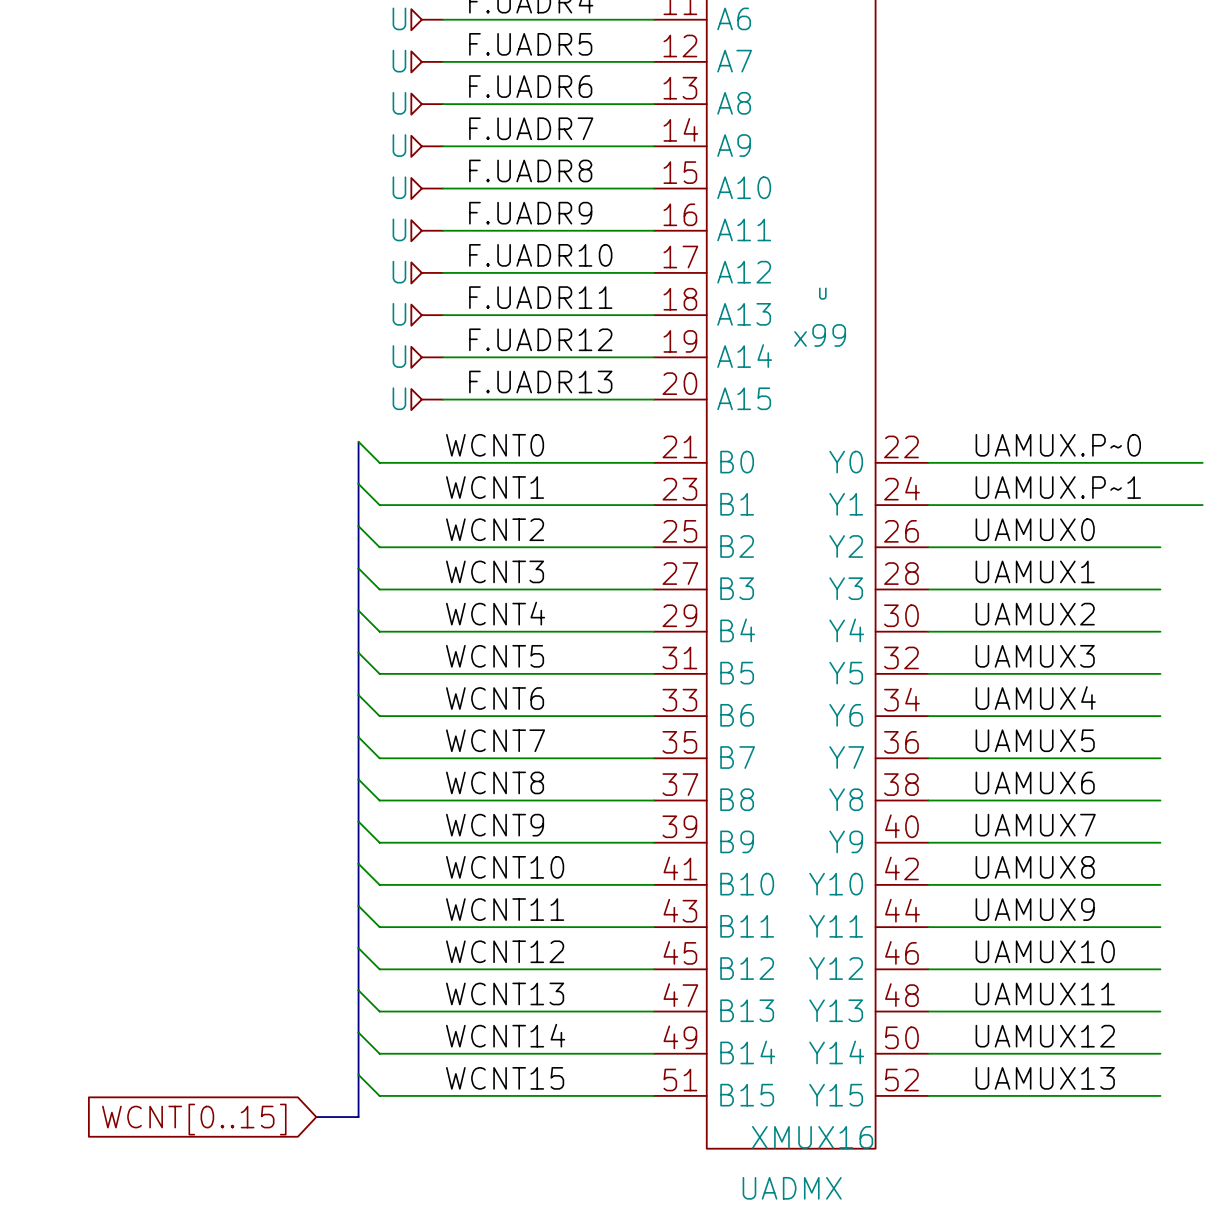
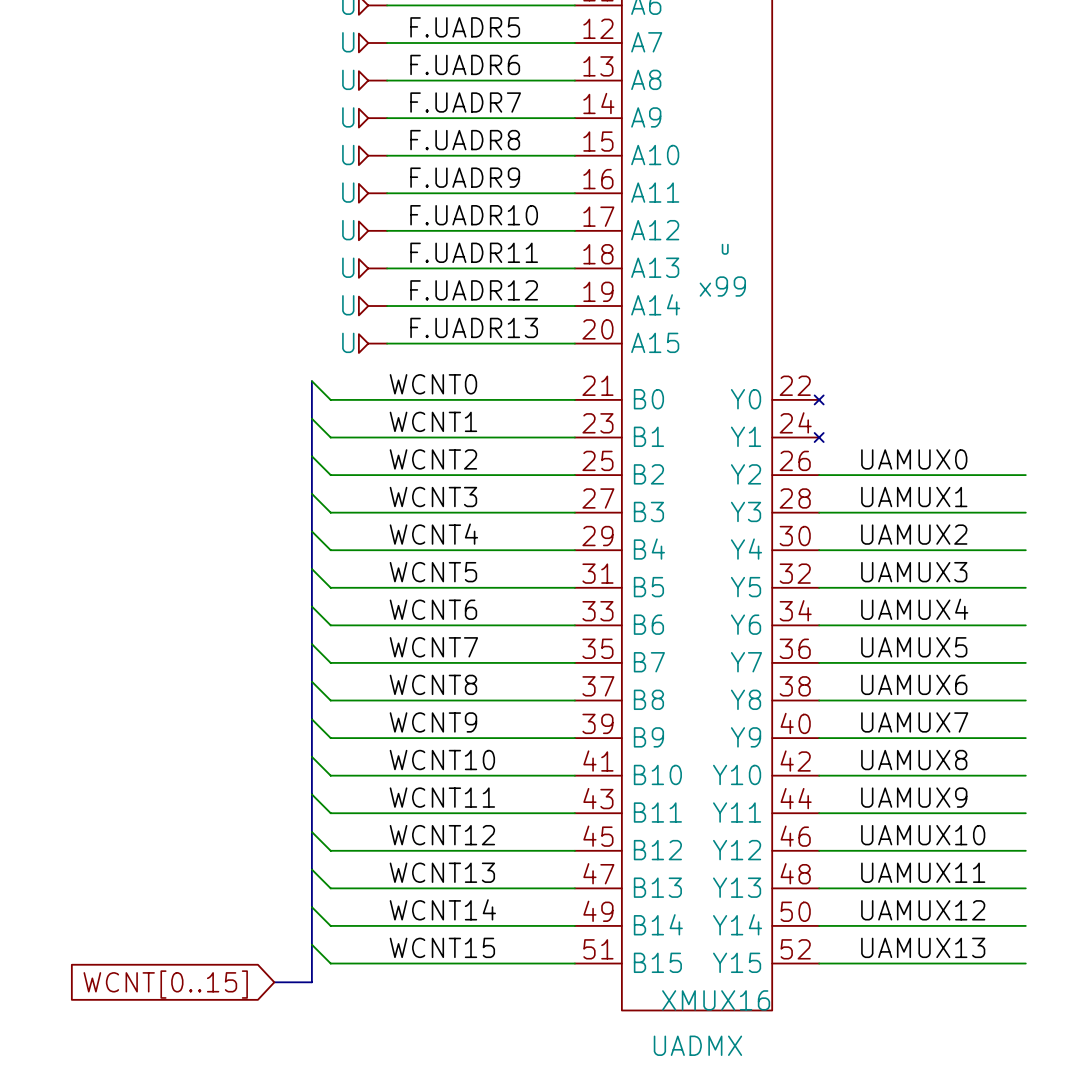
label: UAMUX.P~0 (1058, 445) -> none
wire: (928, 462) (1202, 462) -> none
no-connect mark: none -> (819, 399)
label: UAMUX.P~1 (1058, 487) -> none
wire: (928, 505) (1202, 505) -> none
no-connect mark: none -> (819, 437)

